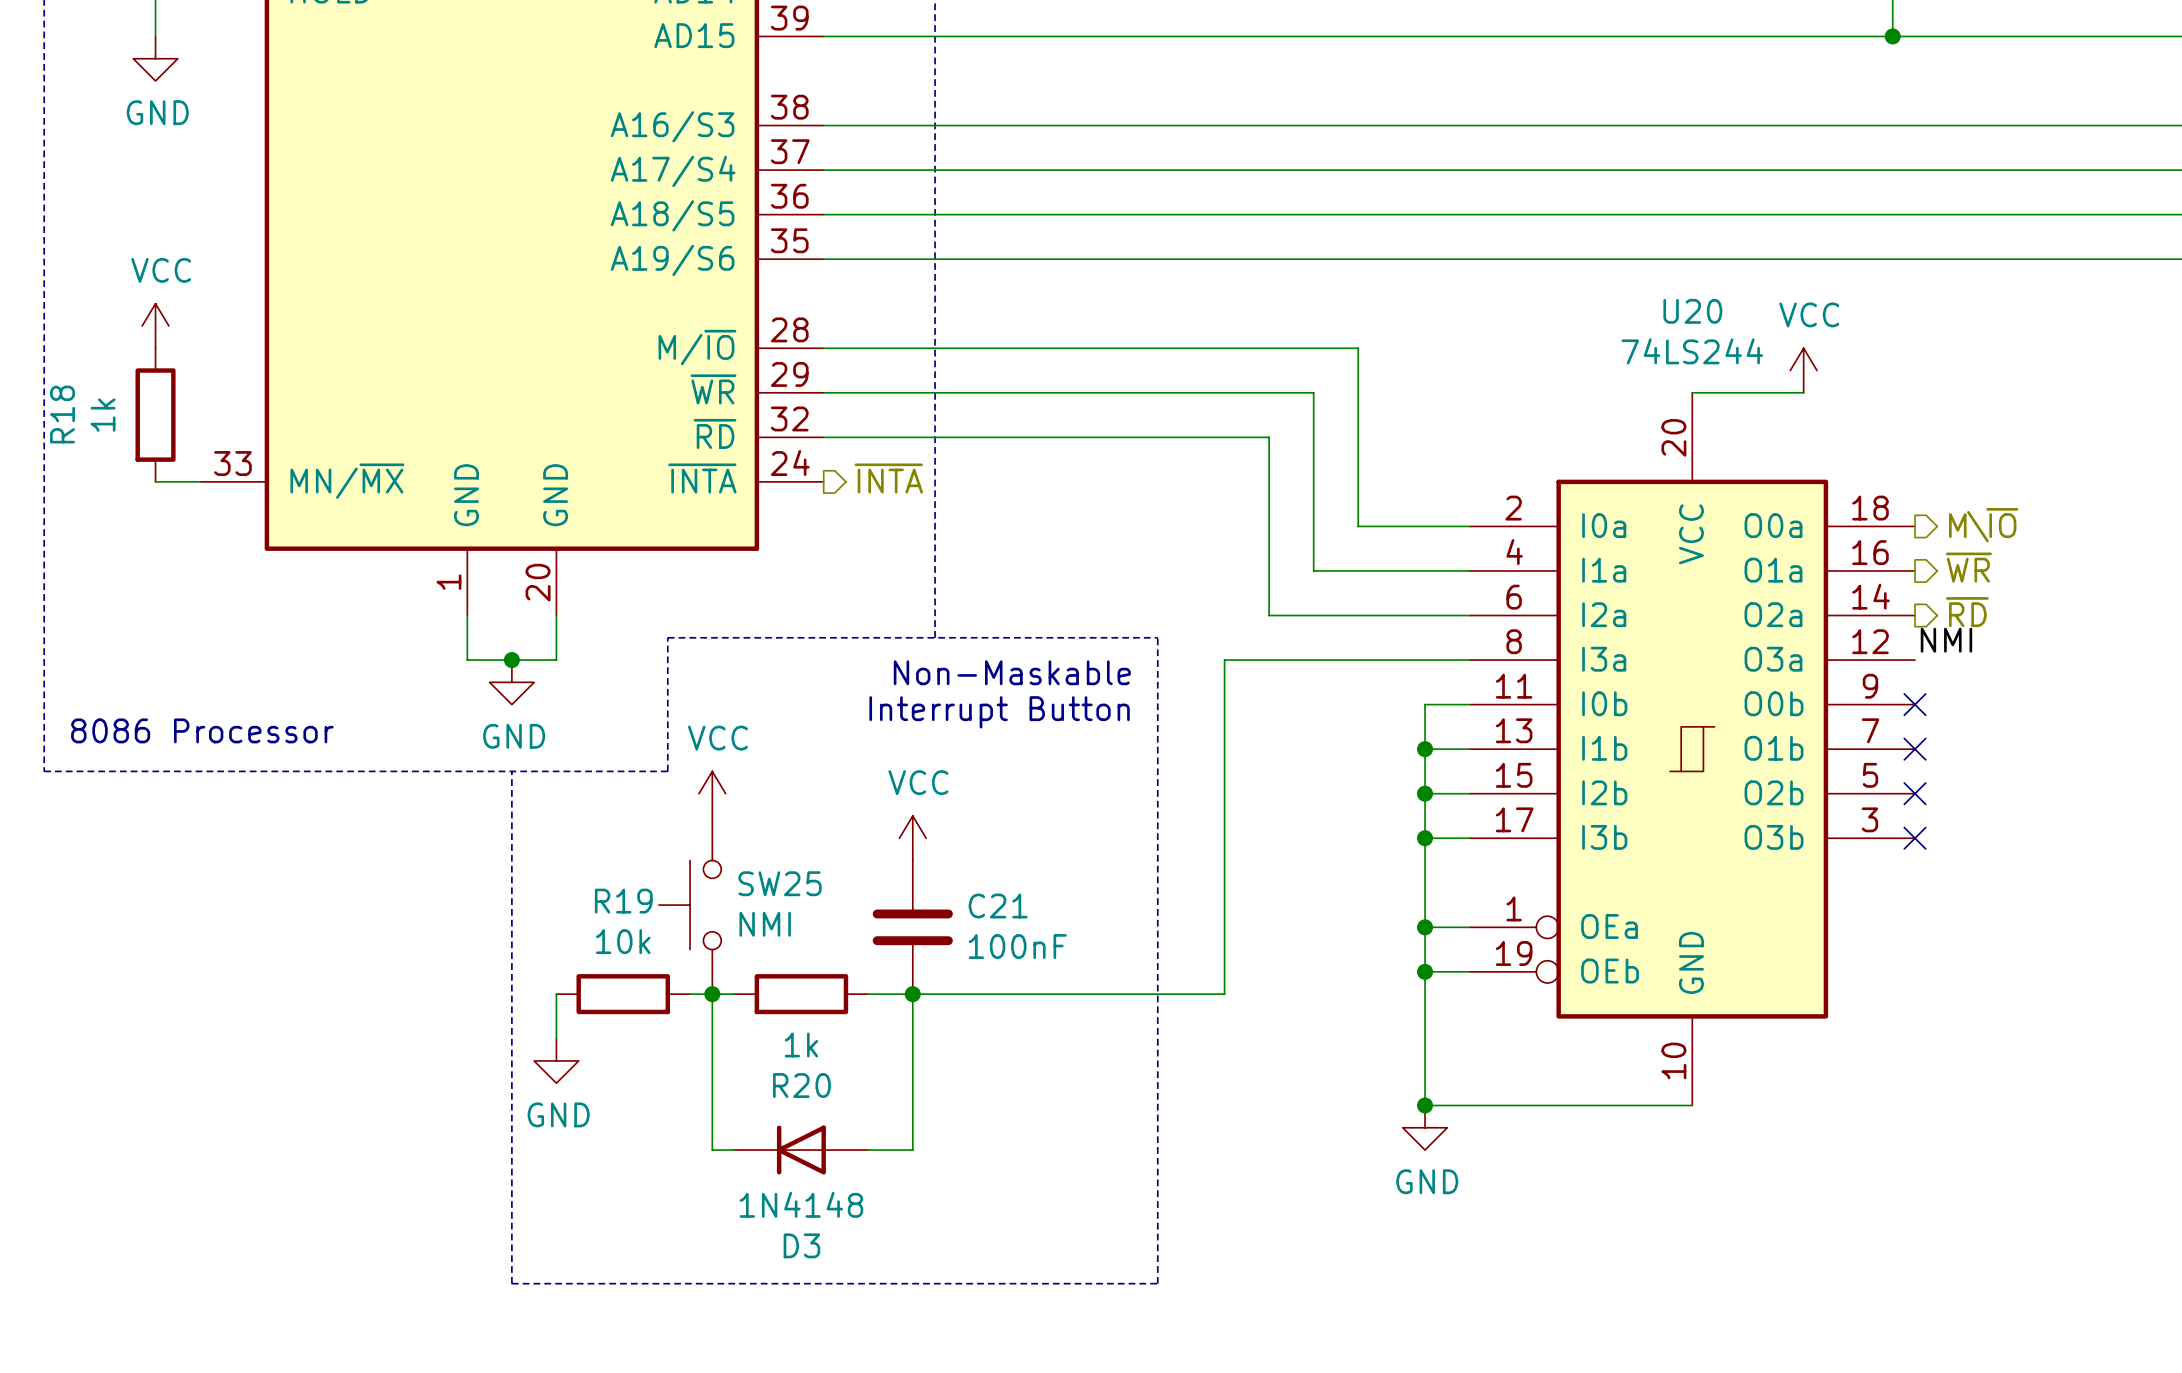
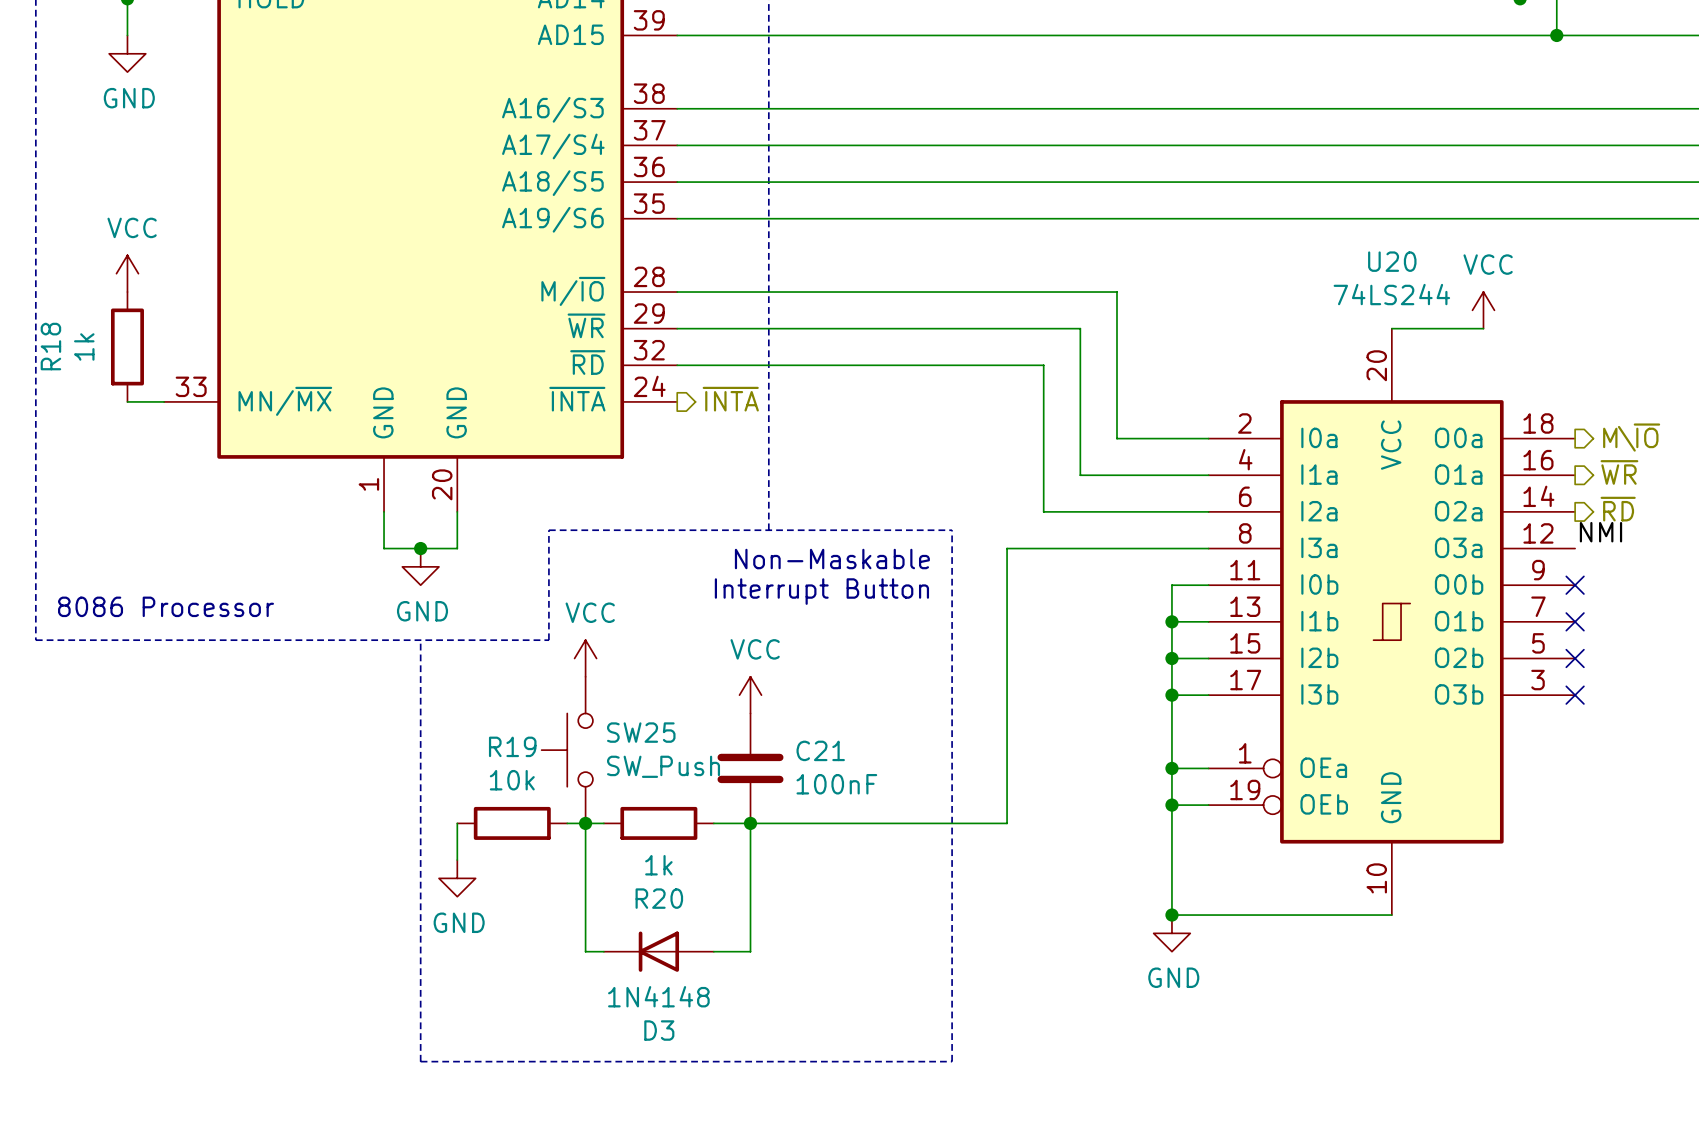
SW25 value: NMI (765, 924) -> SW_Push (663, 766)

